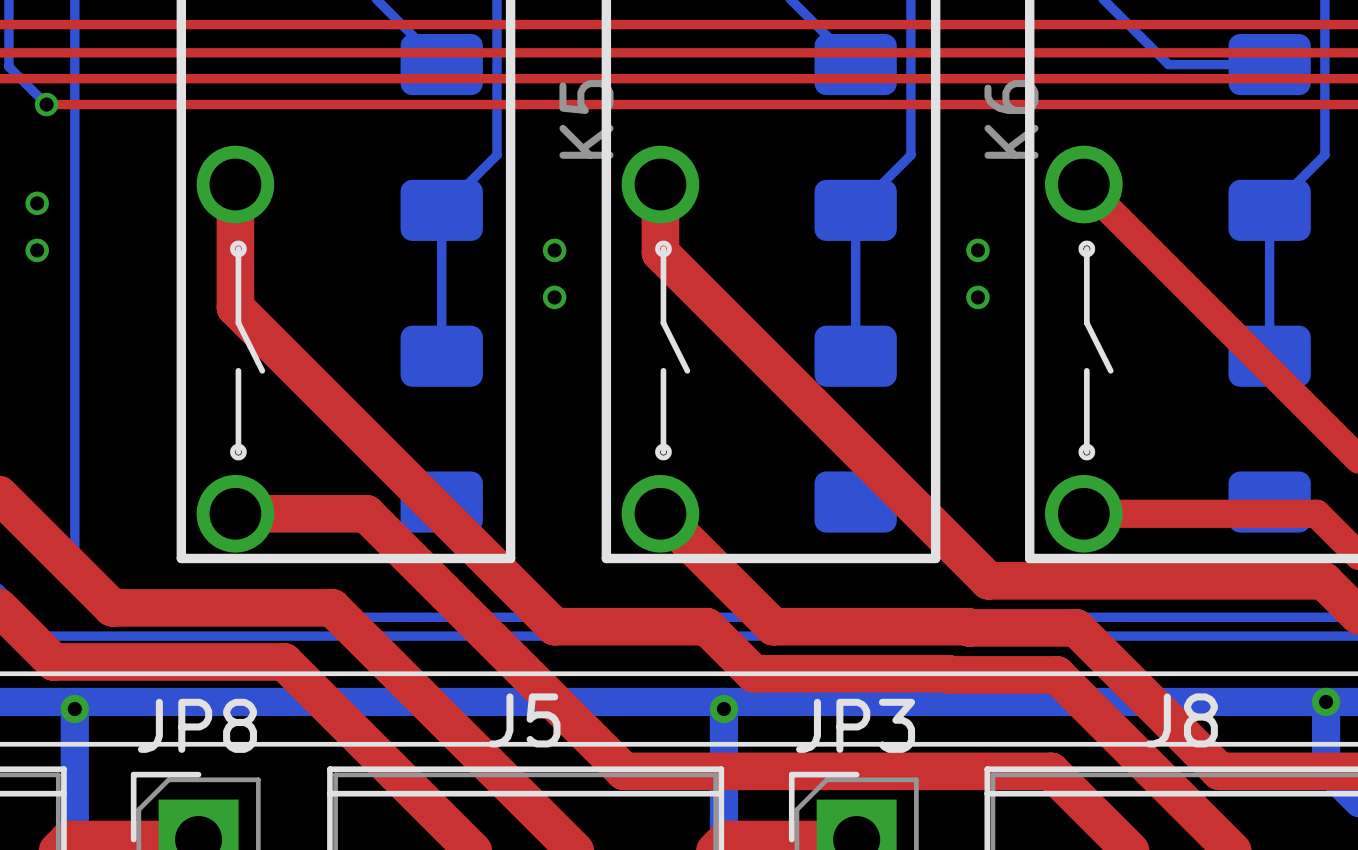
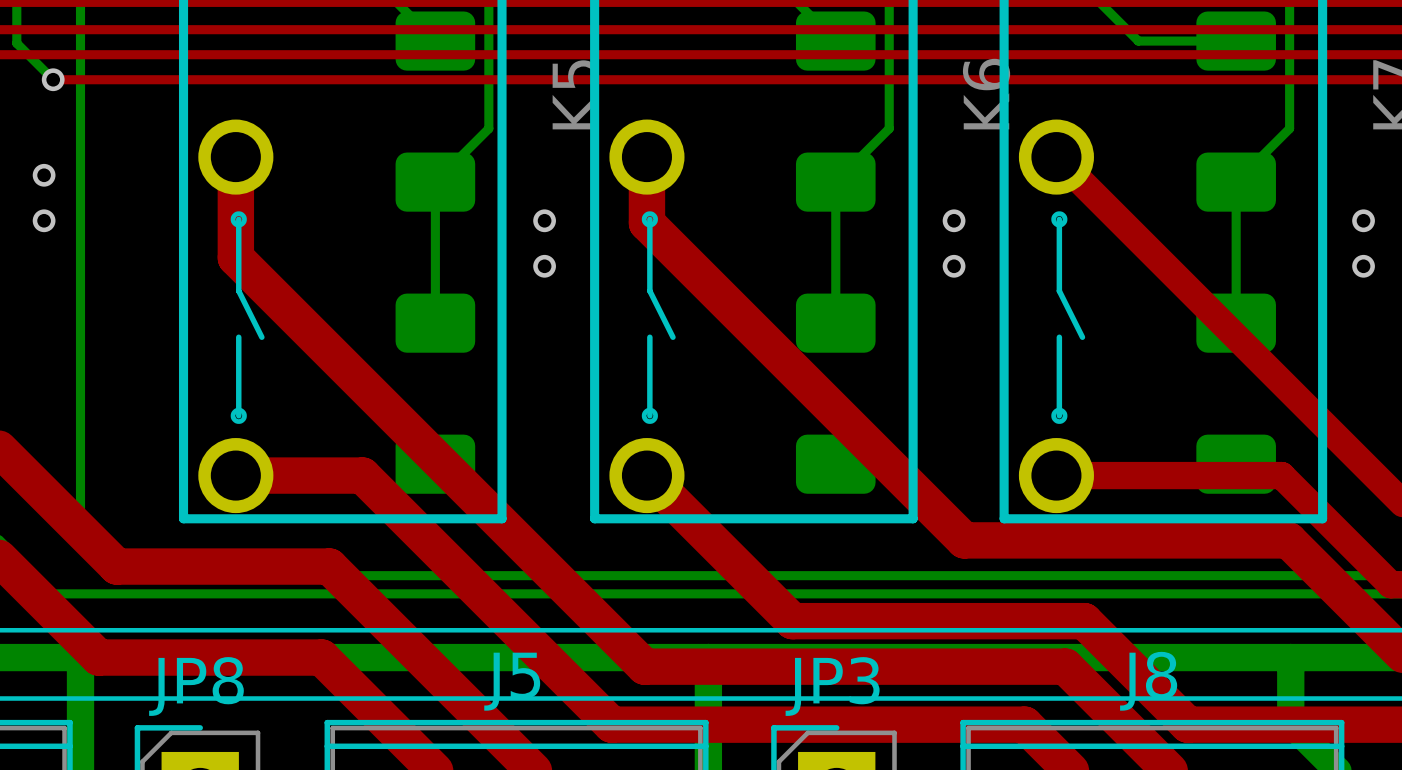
top track: (235, 288) (235, 307) (554, 626) (706, 626) (753, 673) (1056, 674) (1093, 711) -> (235, 257) (644, 666) (1065, 666)
top track: (773, 626) (1076, 627) (1112, 664) -> (756, 584) (792, 621) (1084, 621)
top track: (53, 661) (284, 661) (324, 701) -> (60, 618) (98, 657) (321, 657)
via: (1326, 701) -> none
via: (74, 709) -> none
via: (723, 709) -> none

